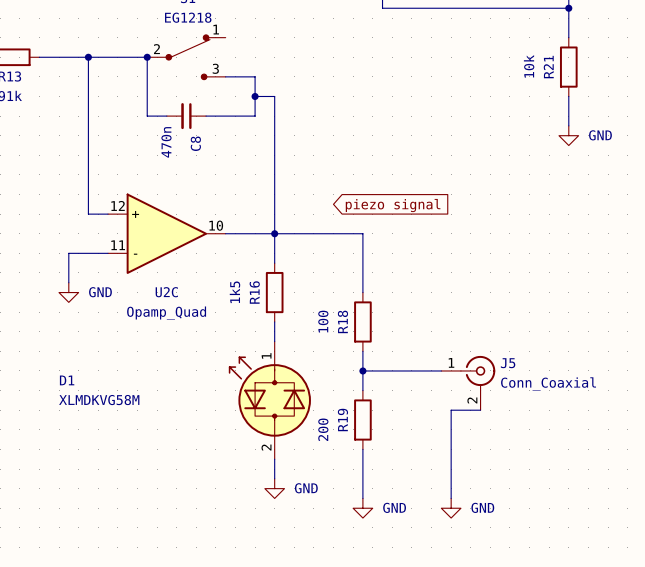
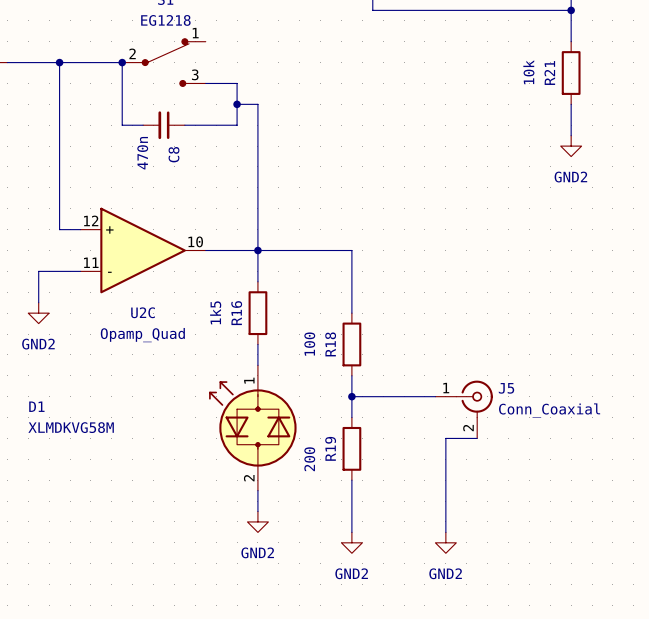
power symbol: GND (568, 135) -> GND2 (571, 146)
global label: piezo signal (393, 205) -> none
power symbol: GND (68, 292) -> GND2 (38, 313)
power symbol: GND (274, 488) -> GND2 (257, 521)
power symbol: GND (362, 508) -> GND2 (351, 542)
power symbol: GND (451, 508) -> GND2 (445, 542)

